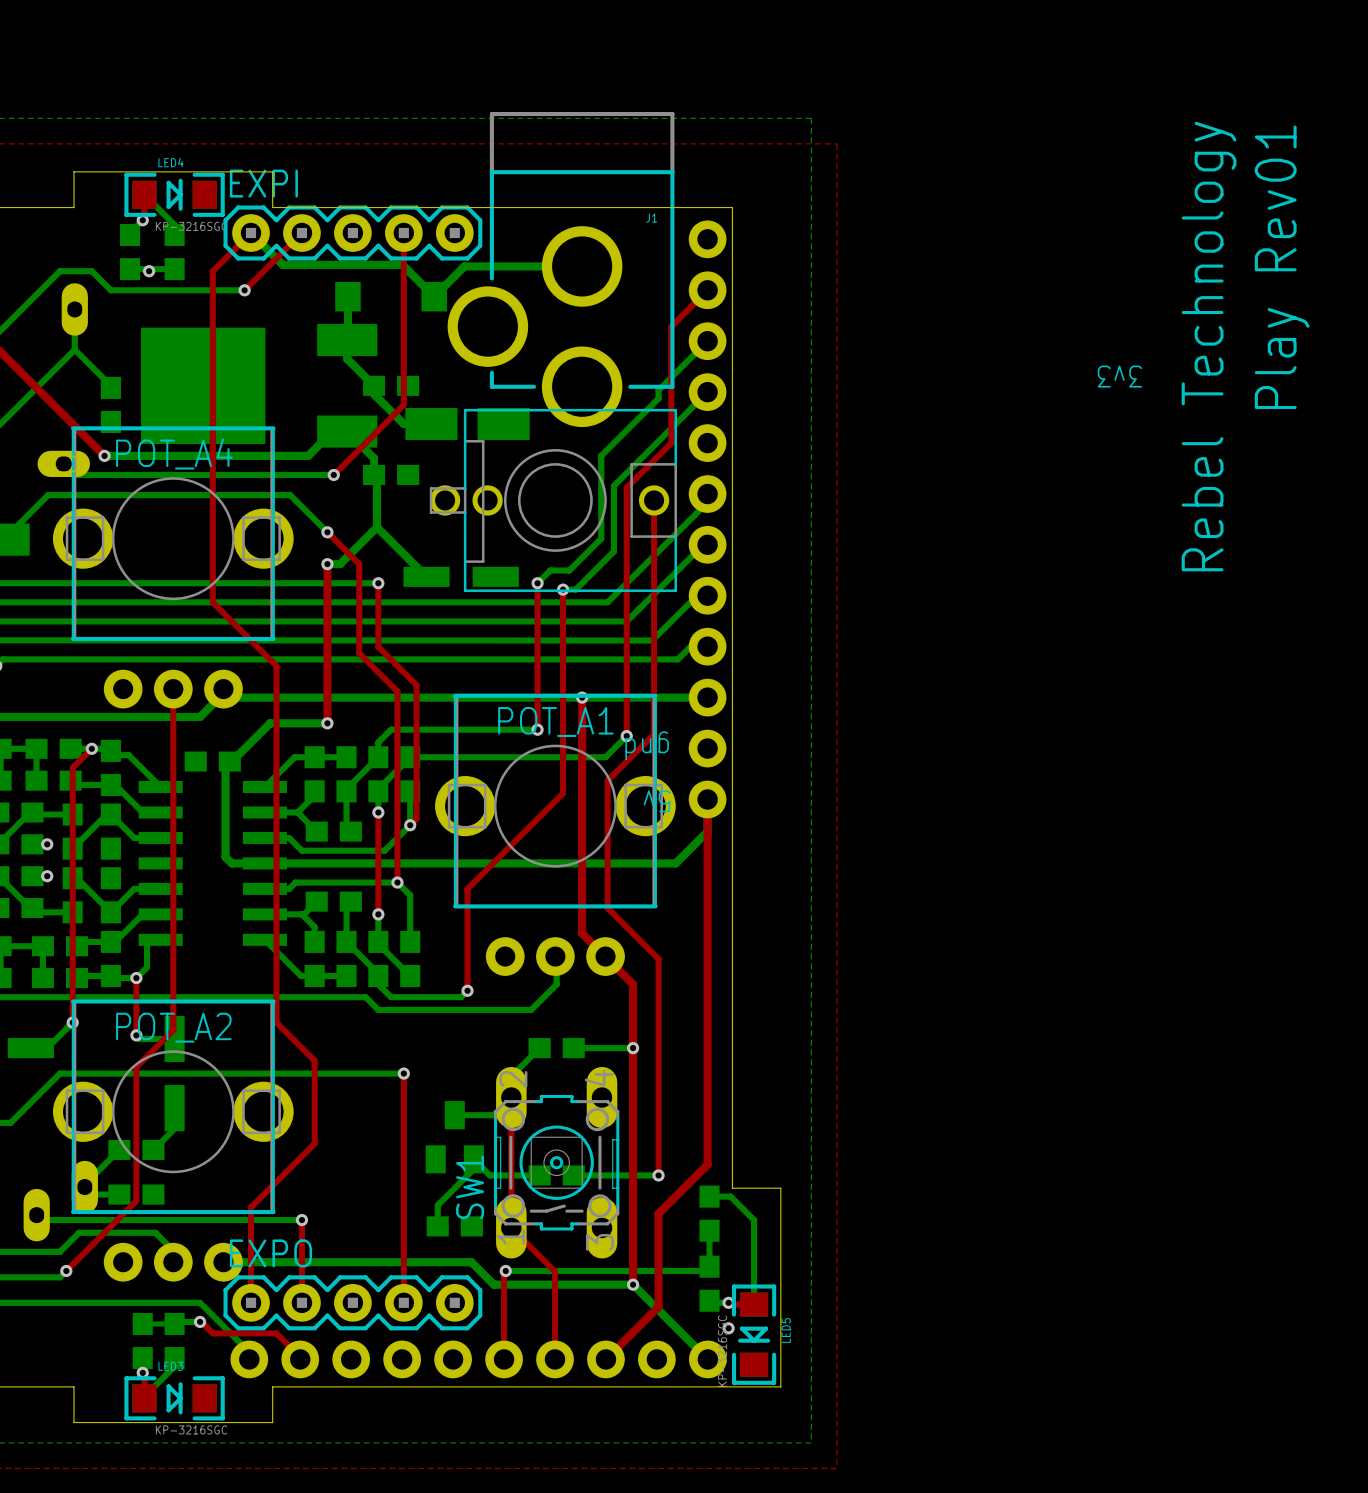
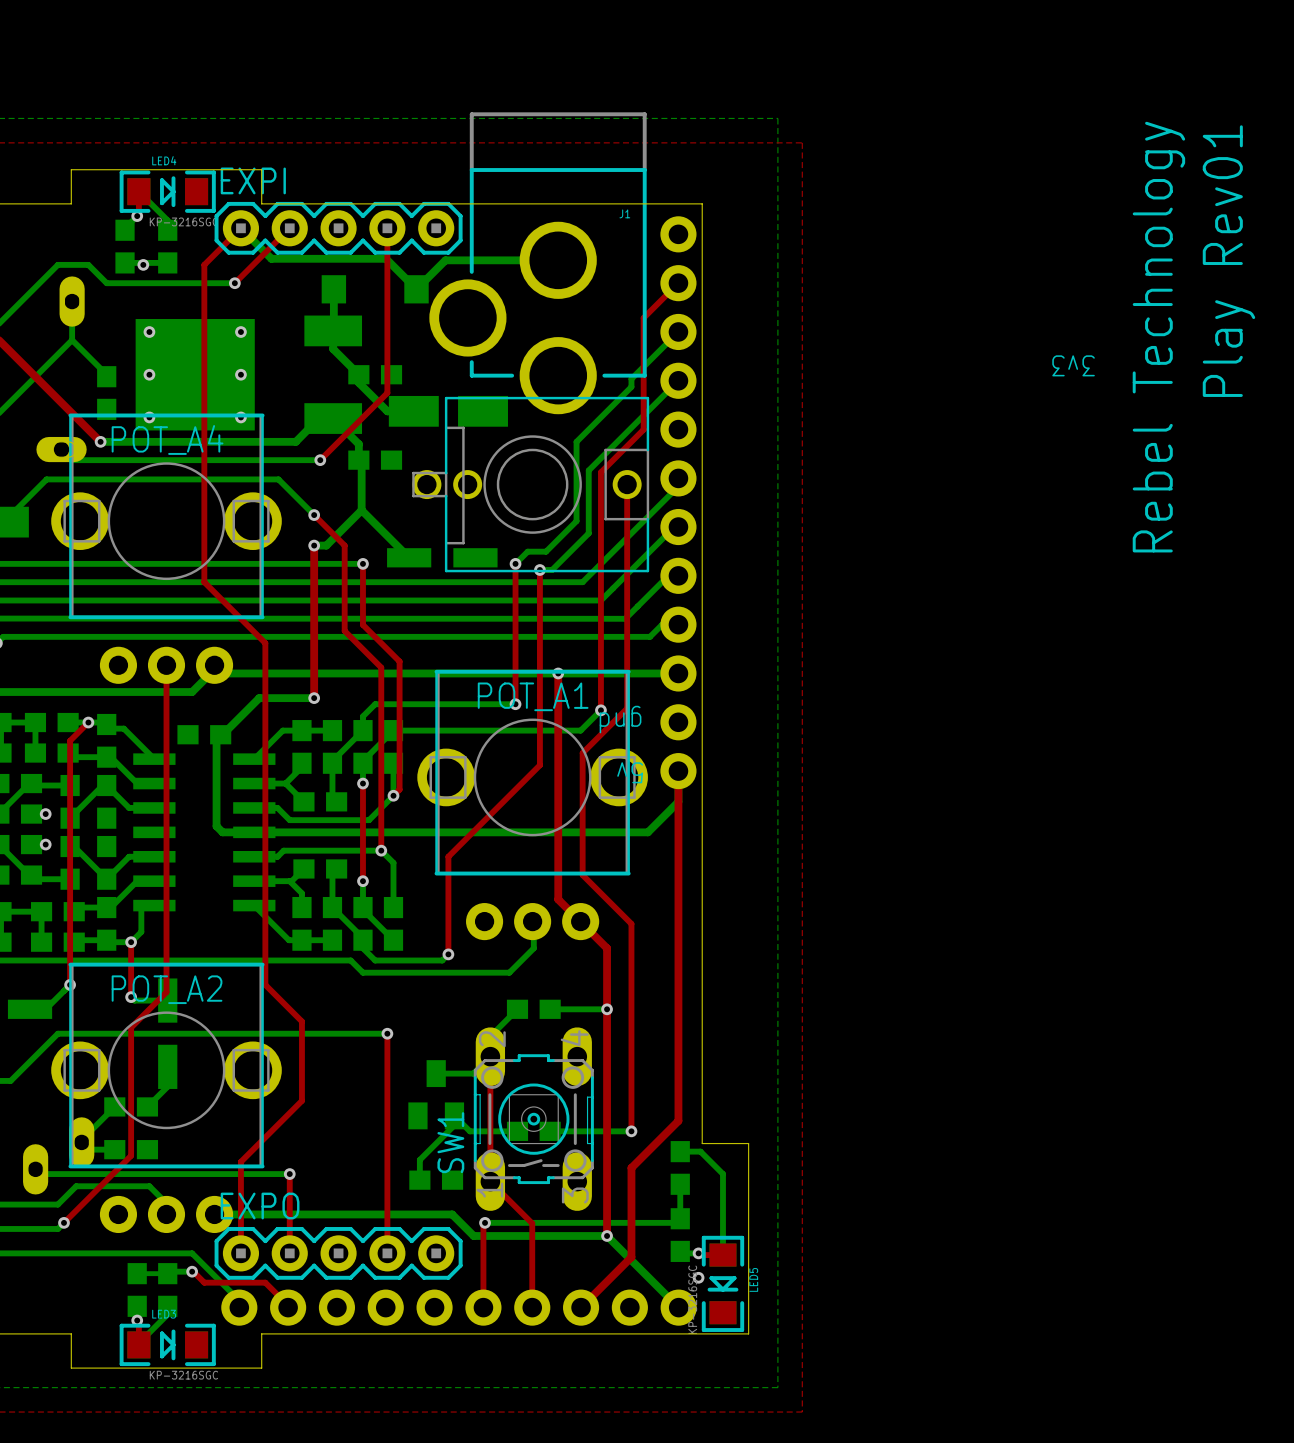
via: none -> (149, 332)
via: none -> (240, 332)
via: none -> (149, 374)
via: none -> (240, 374)
via: none -> (149, 417)
via: none -> (240, 417)

